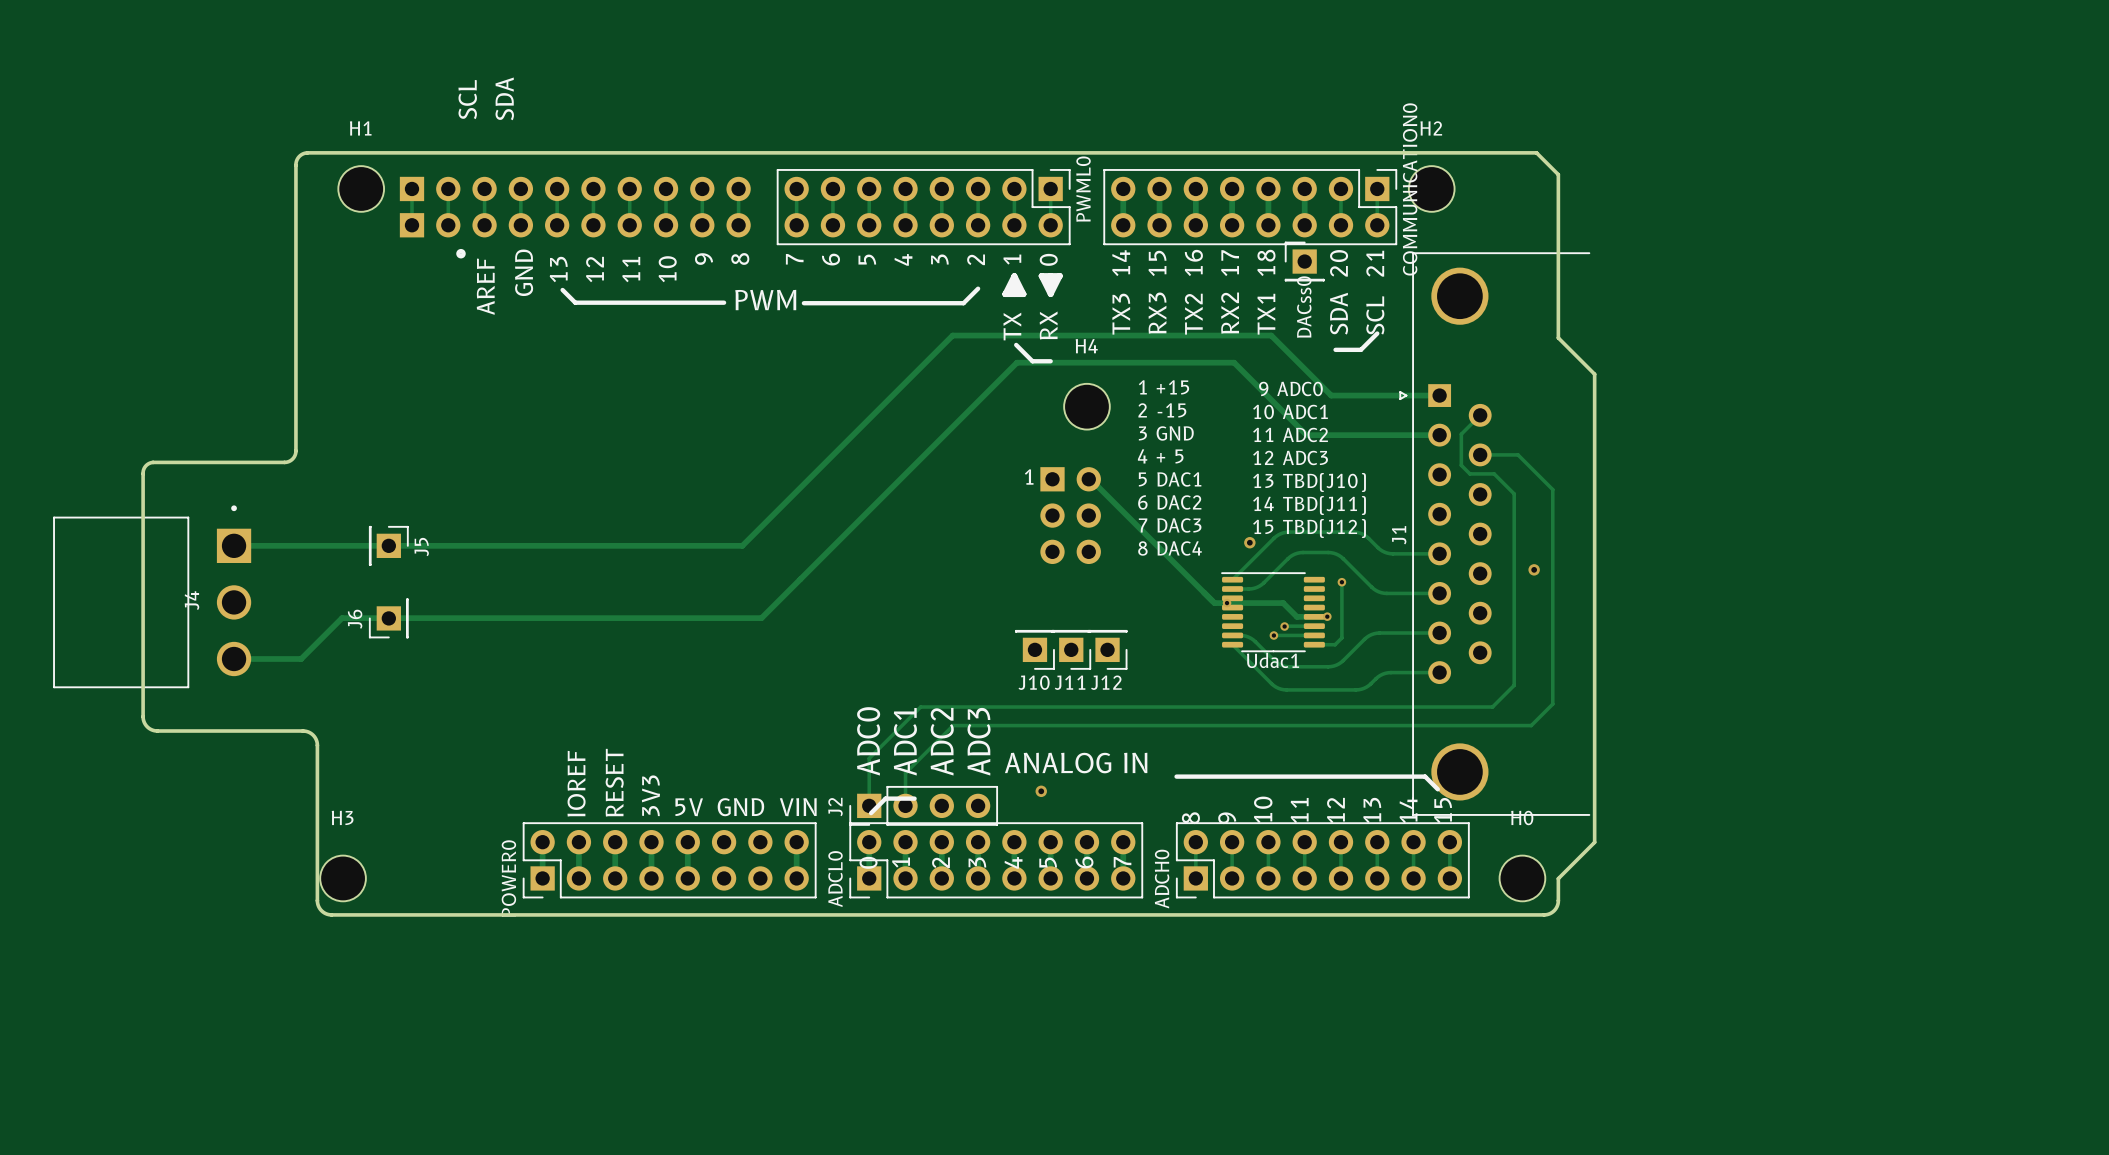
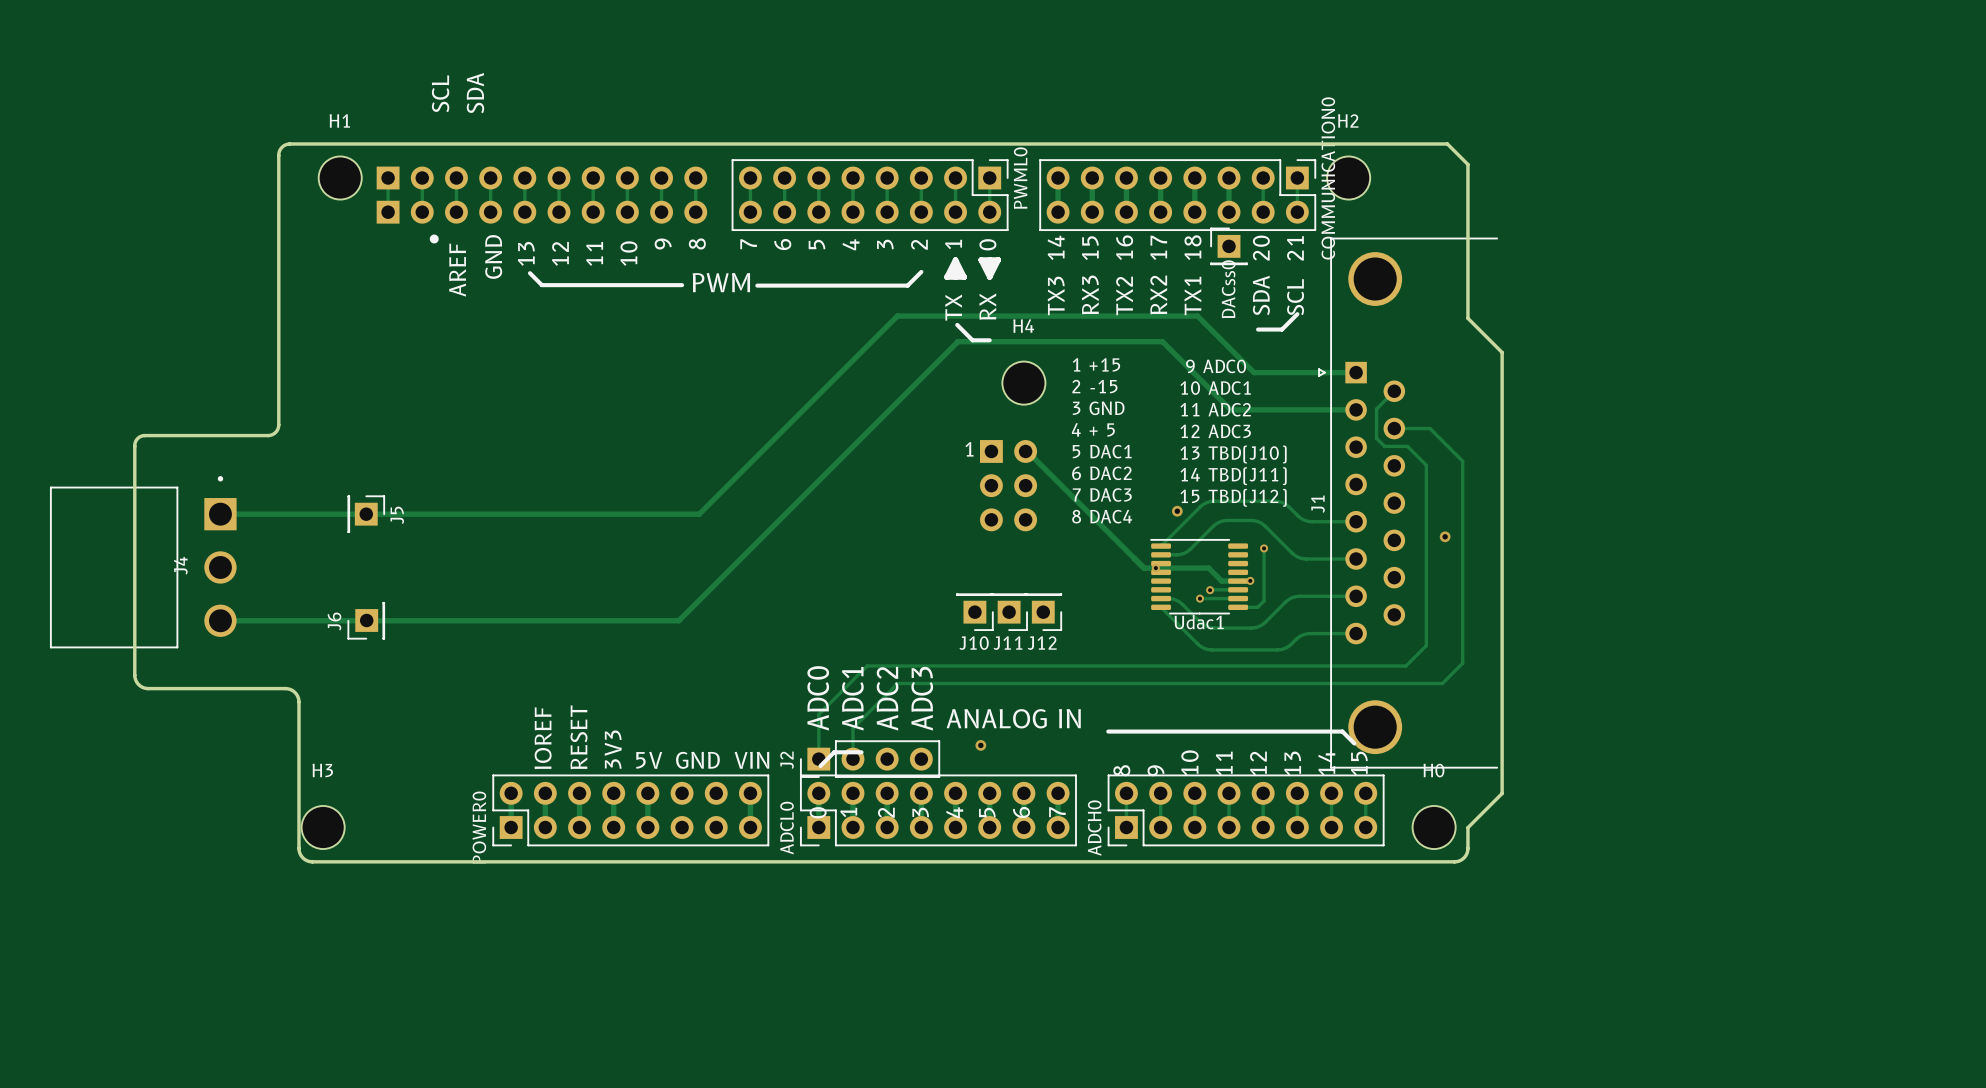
J6 footprint: [368, 598, 409, 639] -> [347, 602, 385, 640]
track: (761, 618) (342, 618) (301, 659) -> (717, 582) (678, 620) (283, 620)

